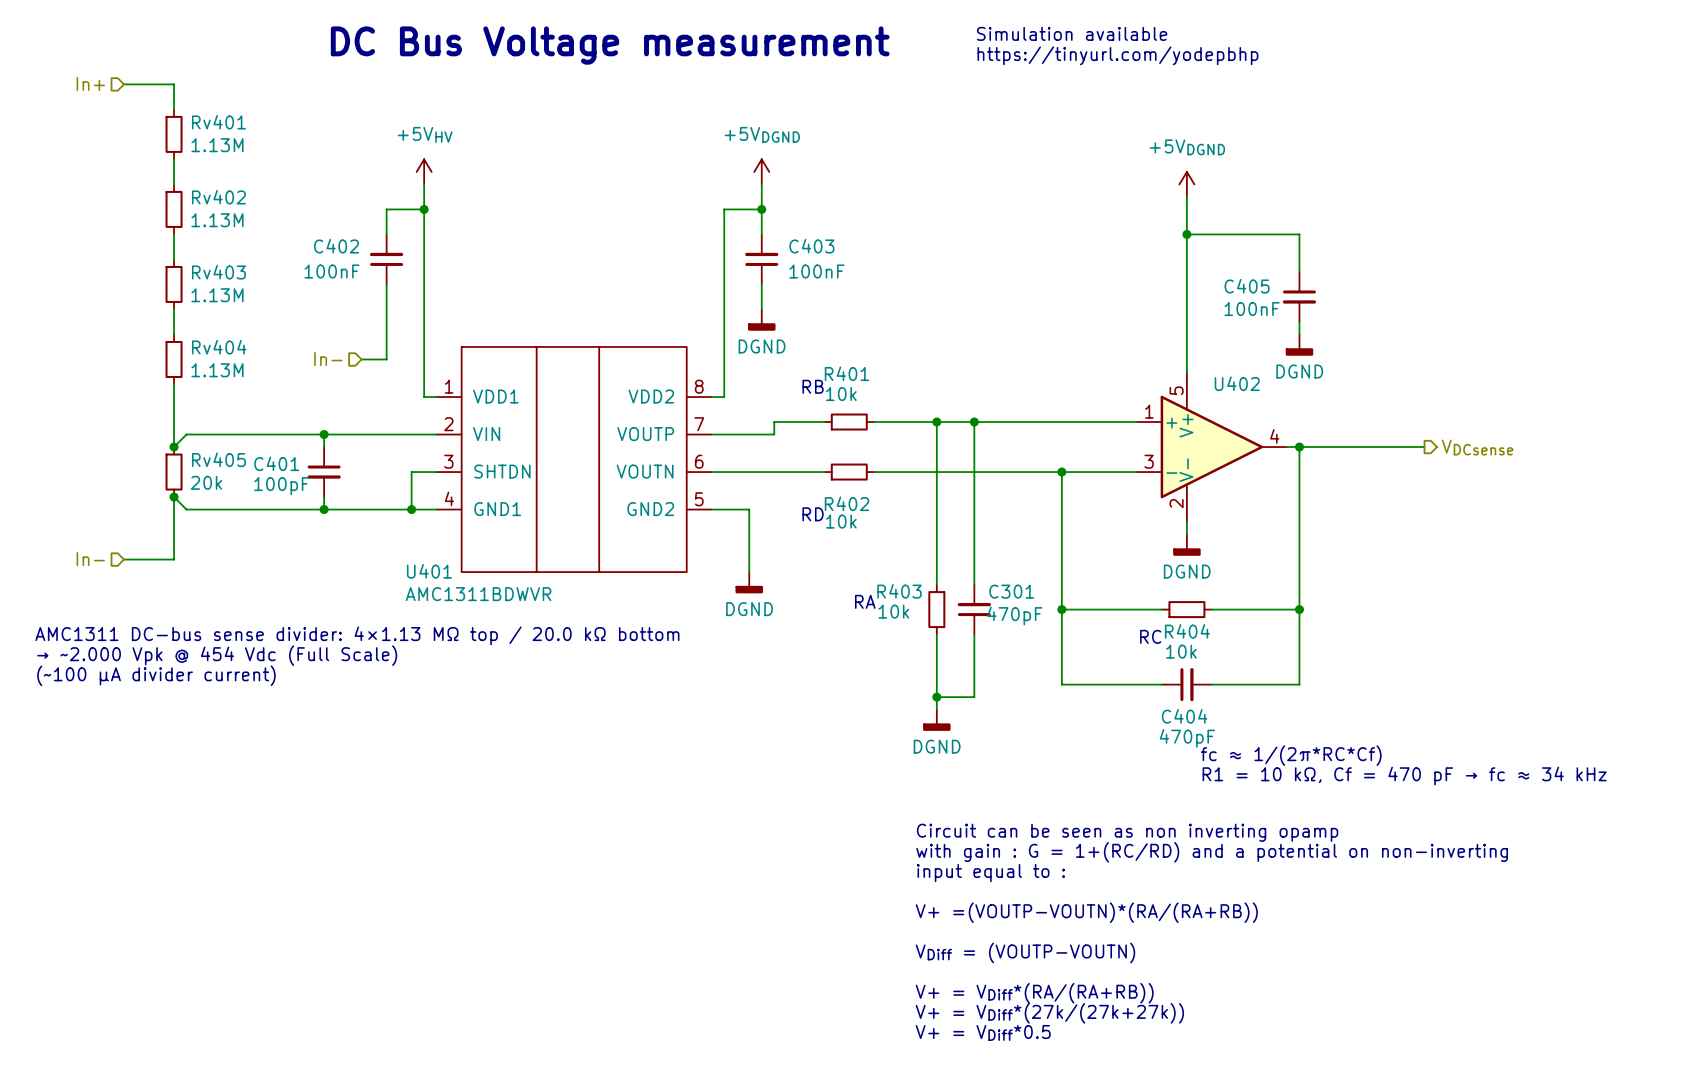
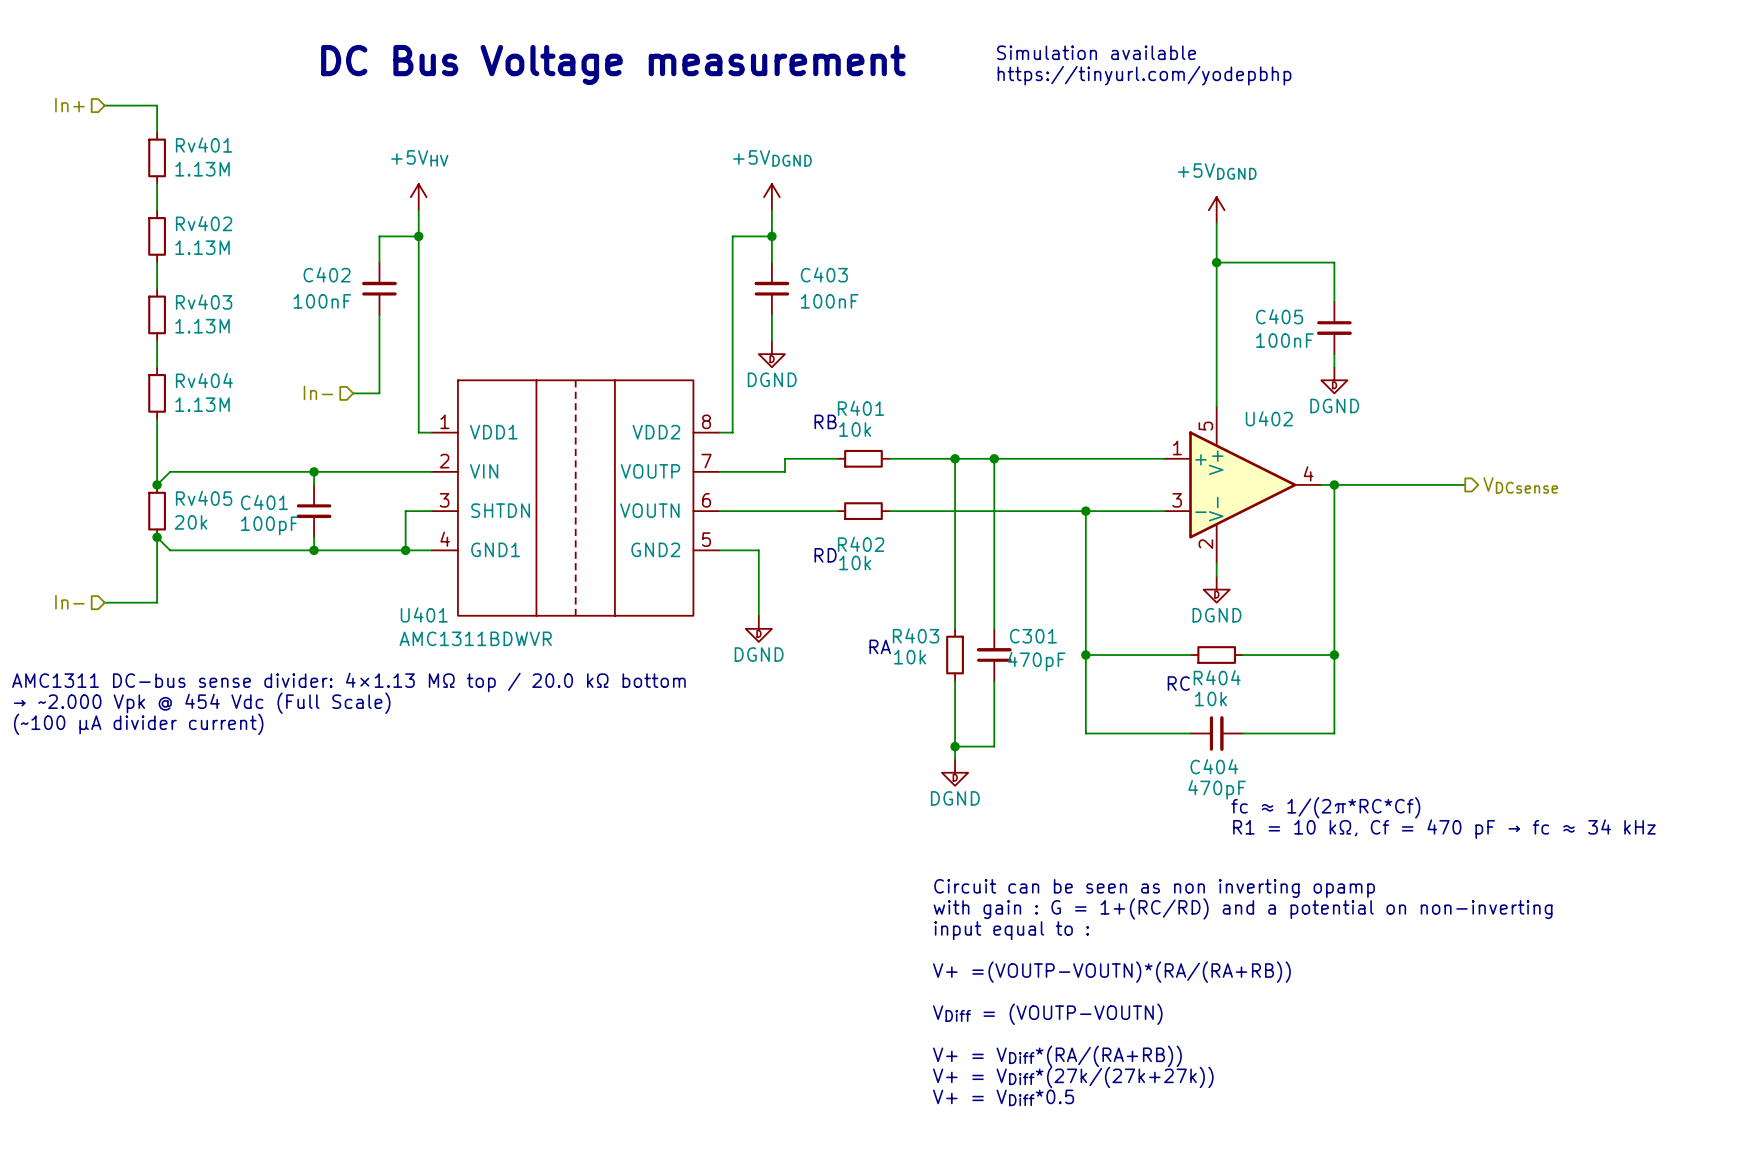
power symbol shape: [748, 309, 776, 331] -> [758, 341, 785, 368]
power symbol shape: [1285, 334, 1314, 356] -> [1321, 367, 1348, 394]
U401 symbol: [436, 346, 712, 573] -> [431, 380, 720, 616]
power symbol shape: [1173, 534, 1201, 556] -> [1203, 576, 1230, 603]
power symbol shape: [735, 572, 764, 594] -> [745, 615, 772, 642]
power symbol shape: [923, 709, 951, 731] -> [941, 759, 969, 786]

